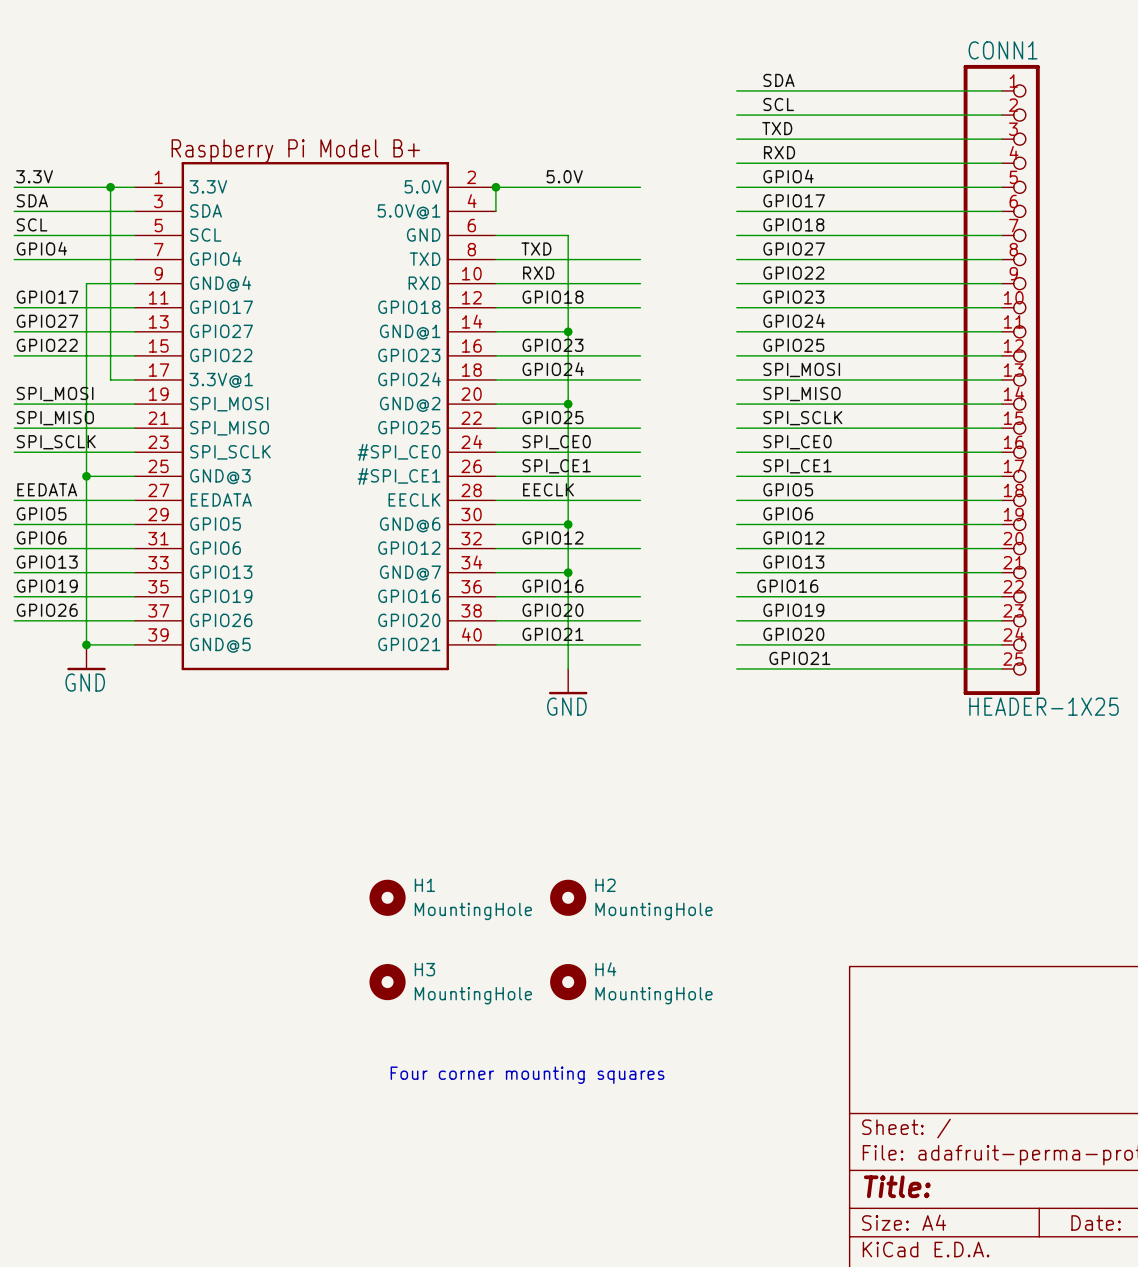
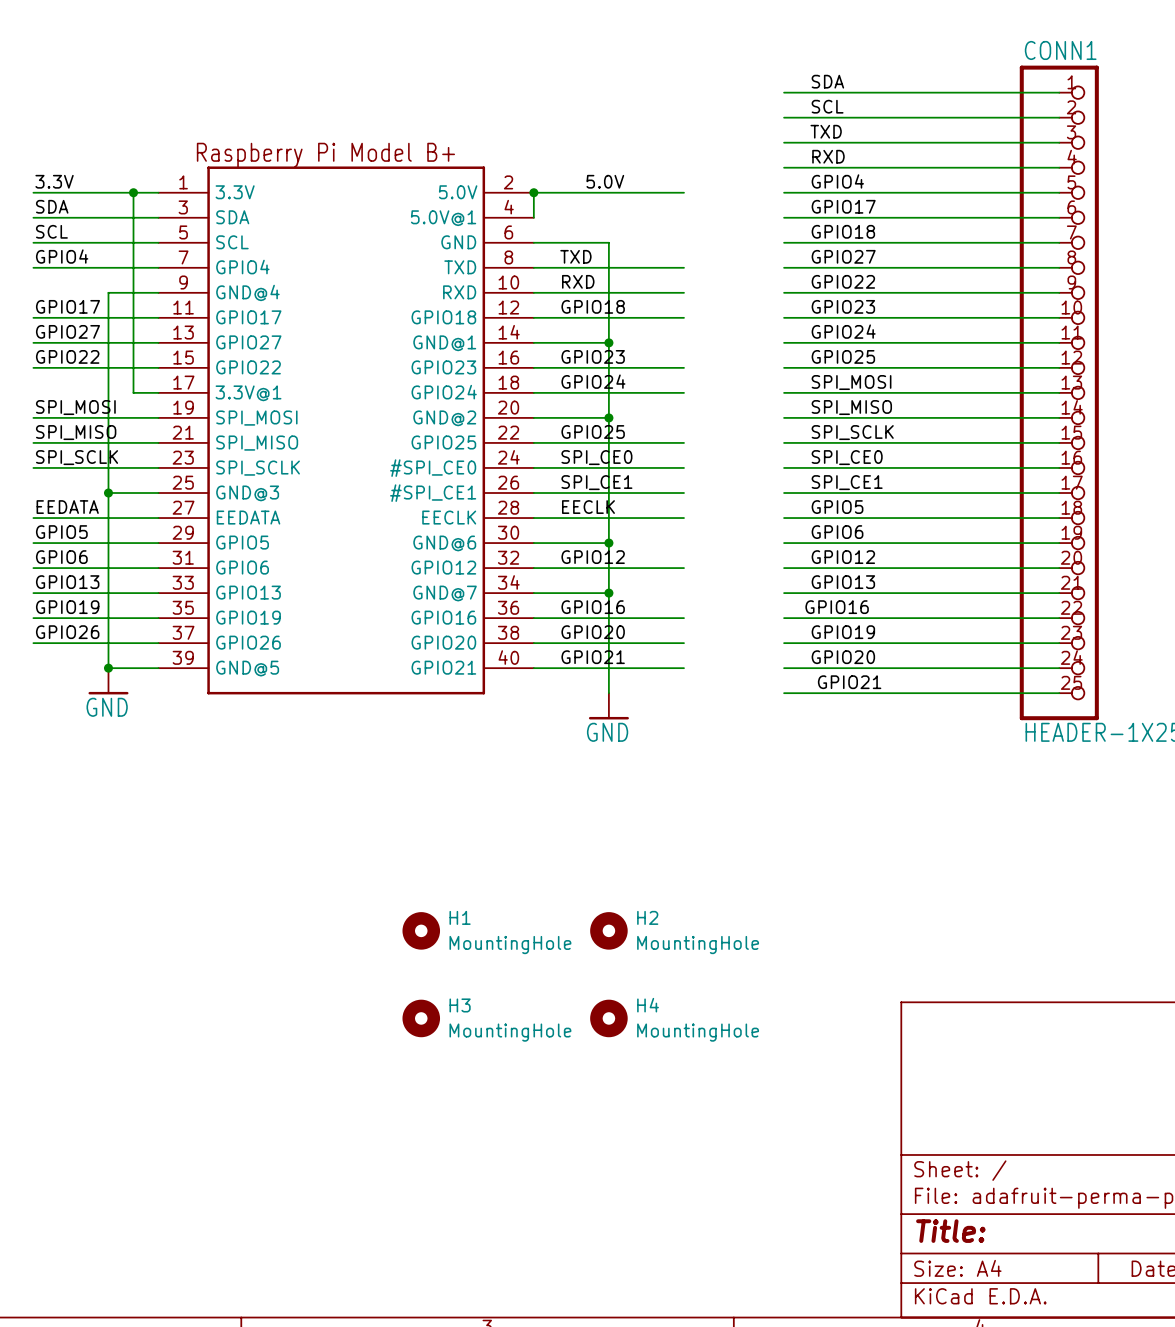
text: Four corner mounting squares (527, 1075) -> none

